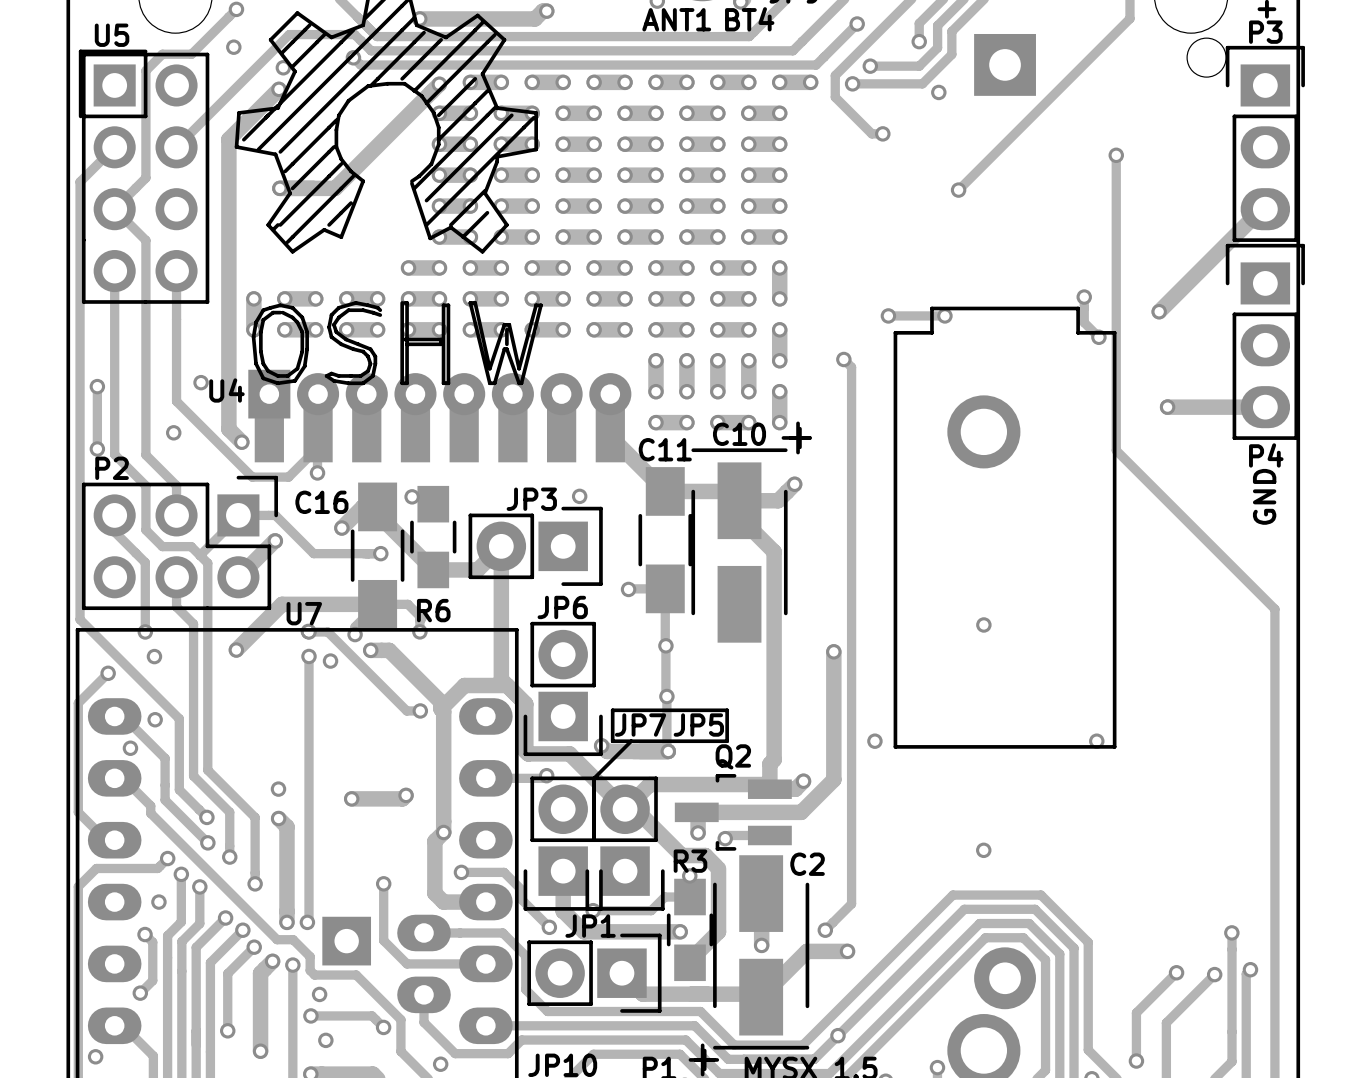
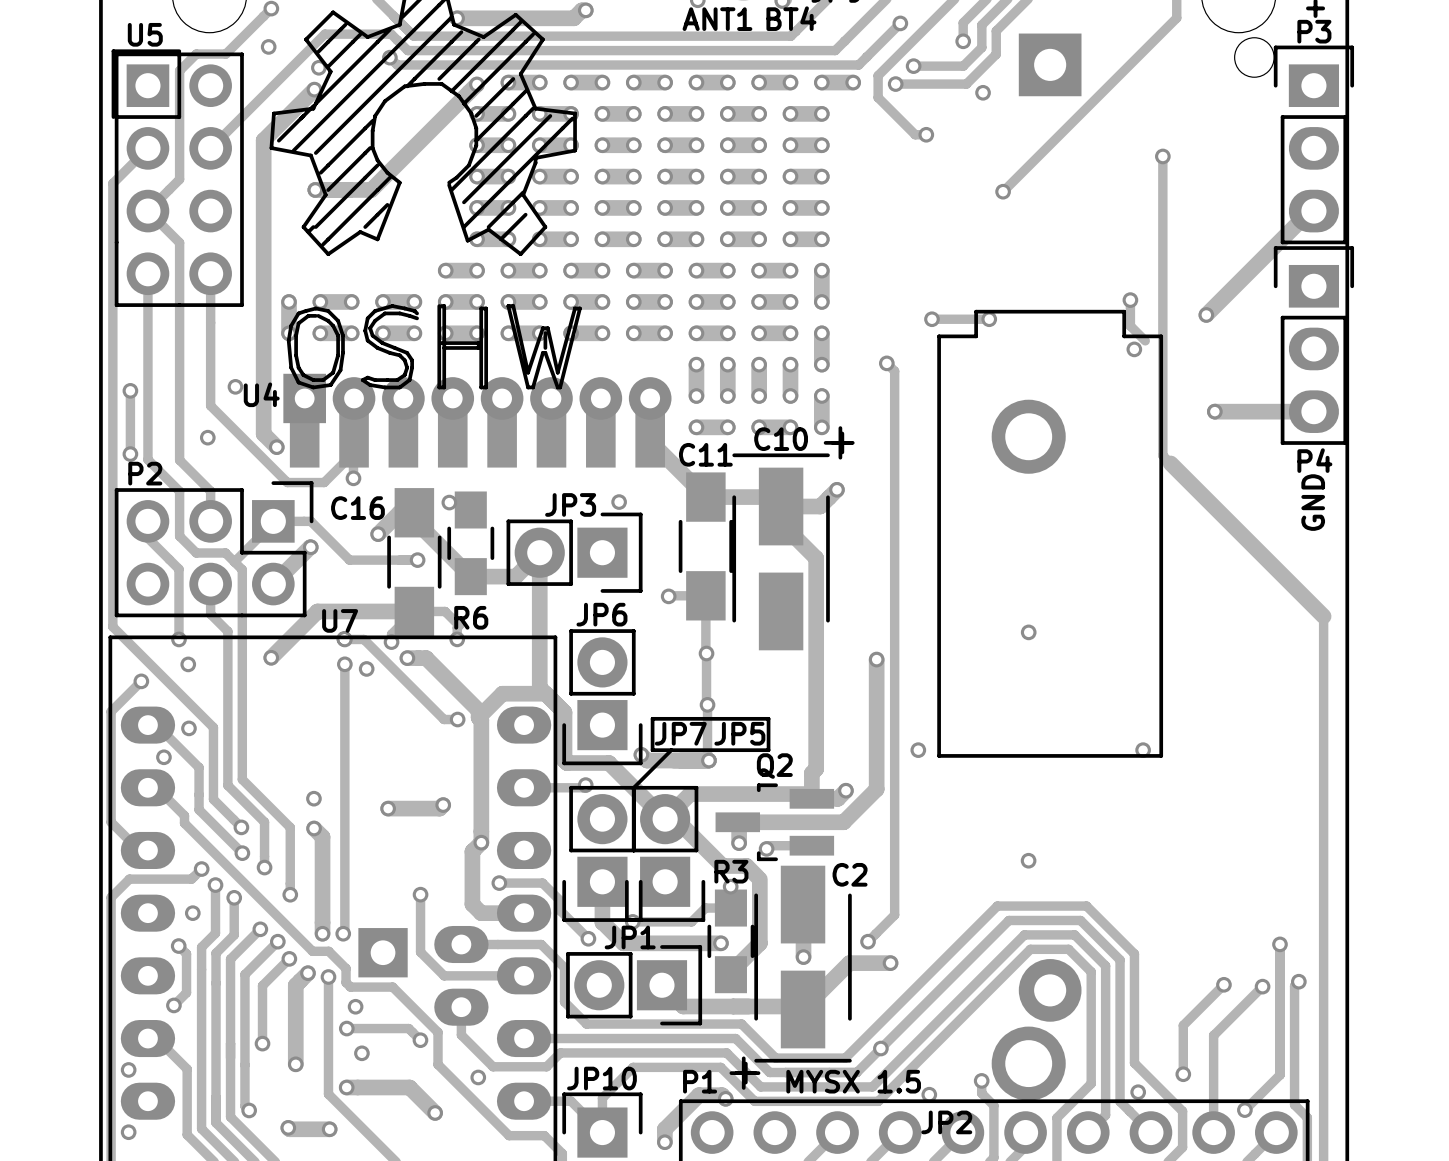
via position: (1098, 337) -> (1134, 349)
track width: thin (1123, 458) (1274, 609) -> thick (1170, 463) (1323, 616)

